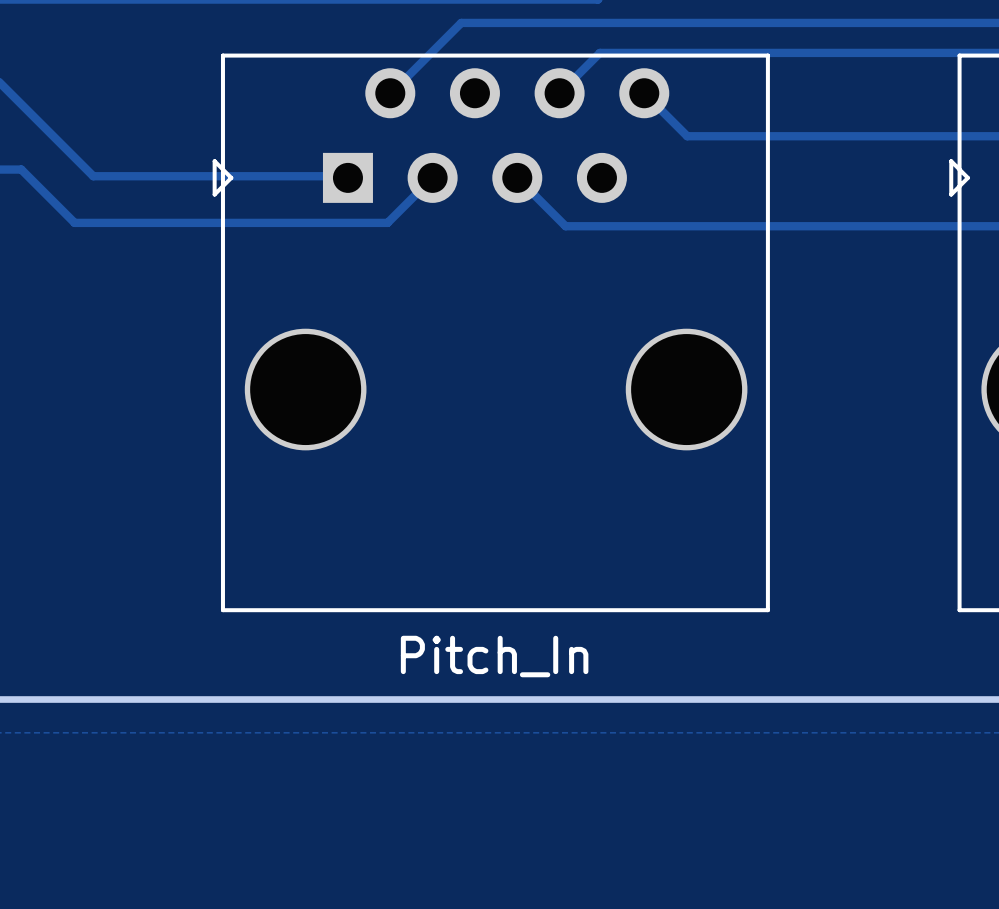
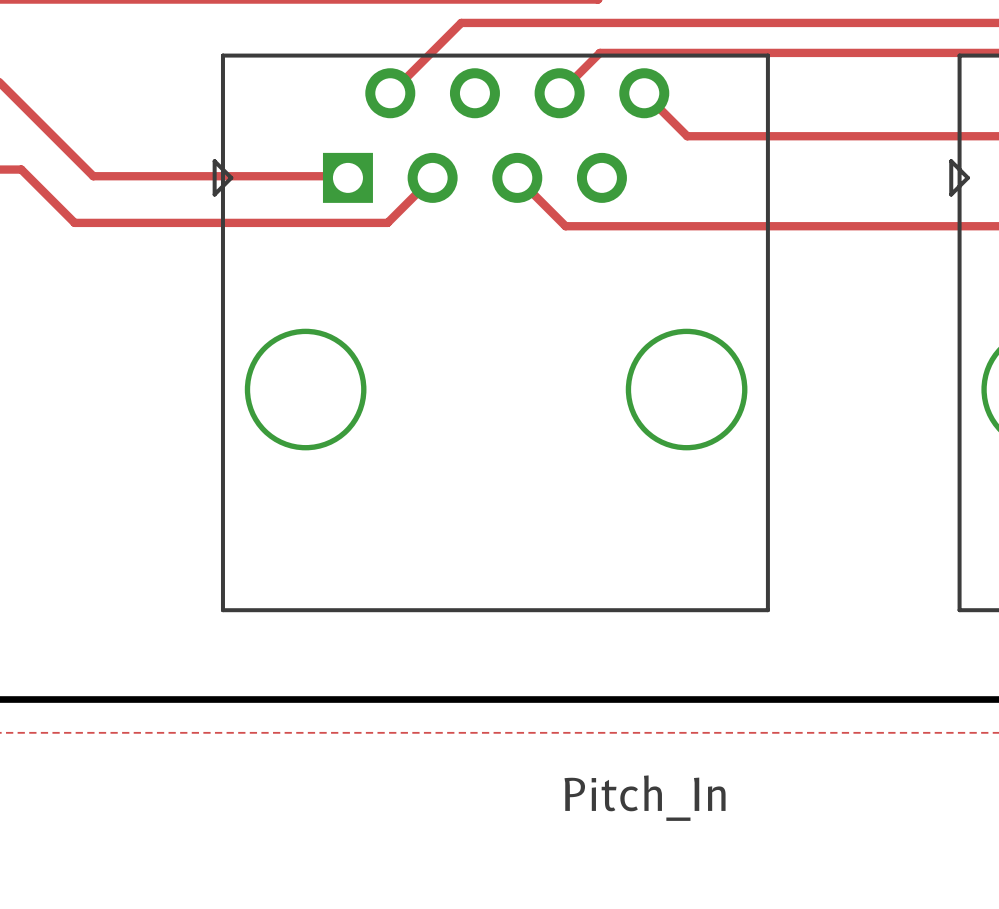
part value position: Pitch_In (494, 656) -> Pitch_In (645, 798)

